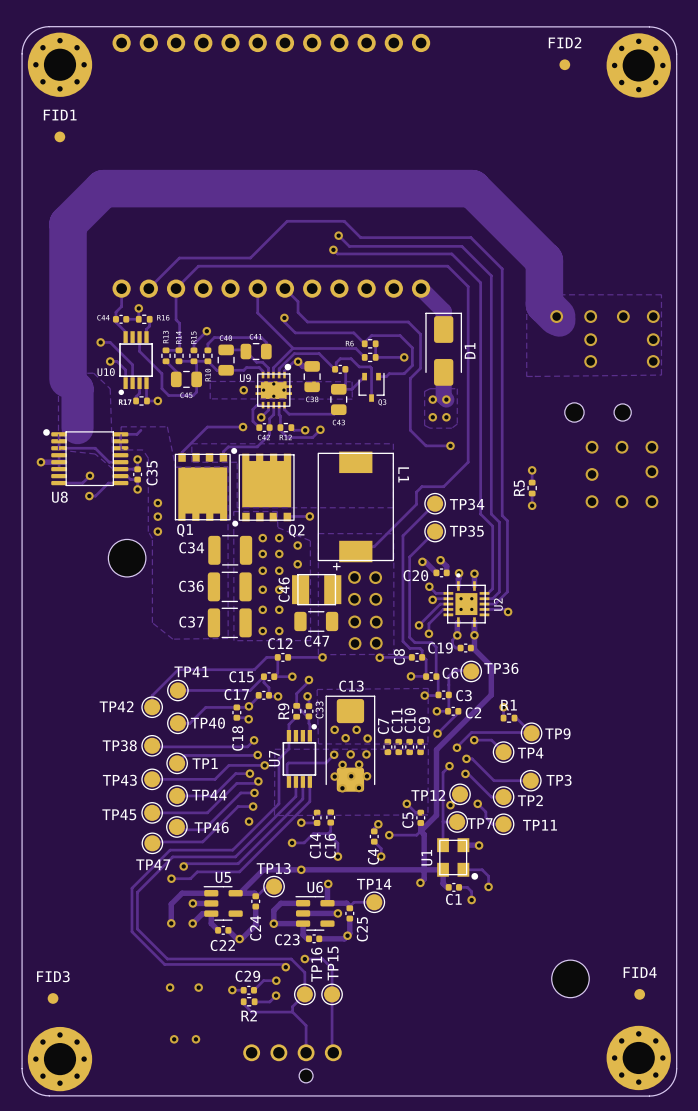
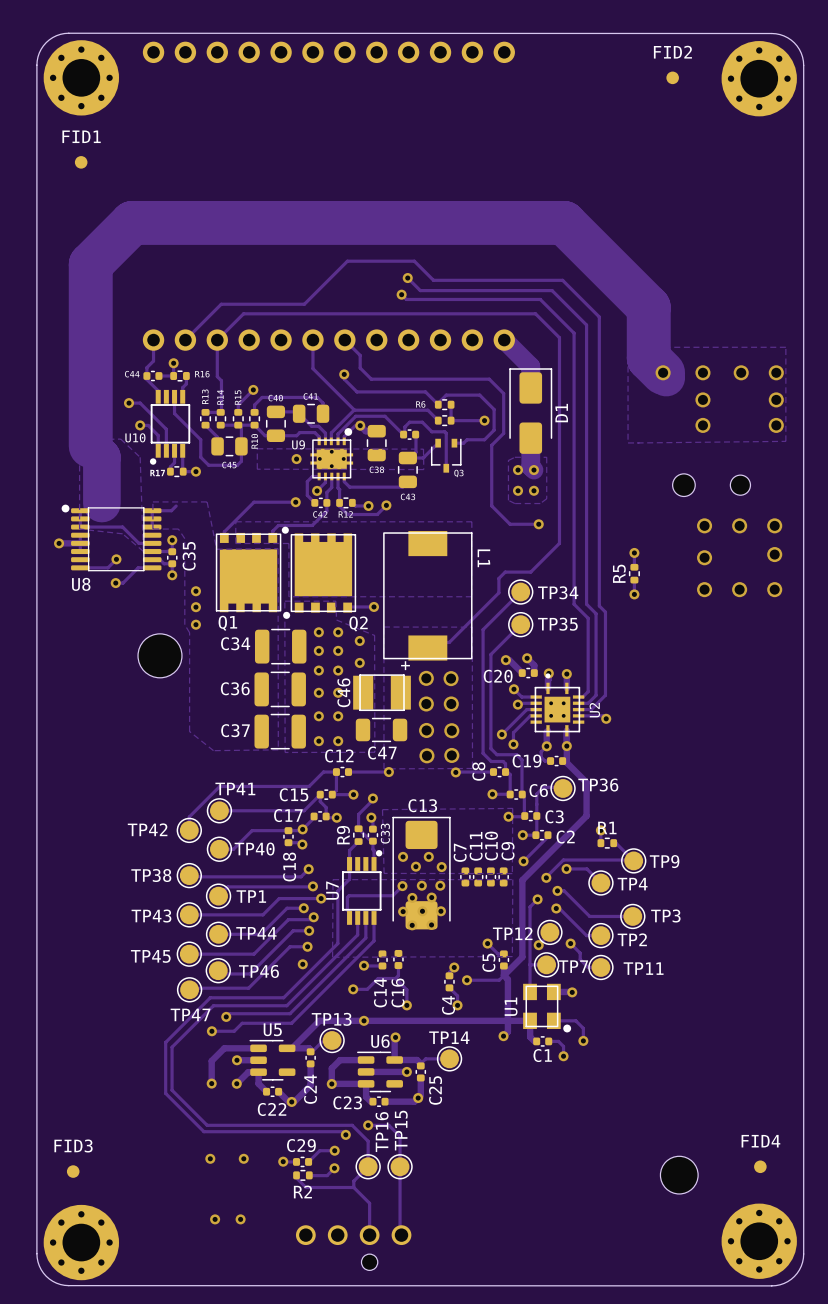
part: (570, 978) -> none
part: none -> (679, 1175)

